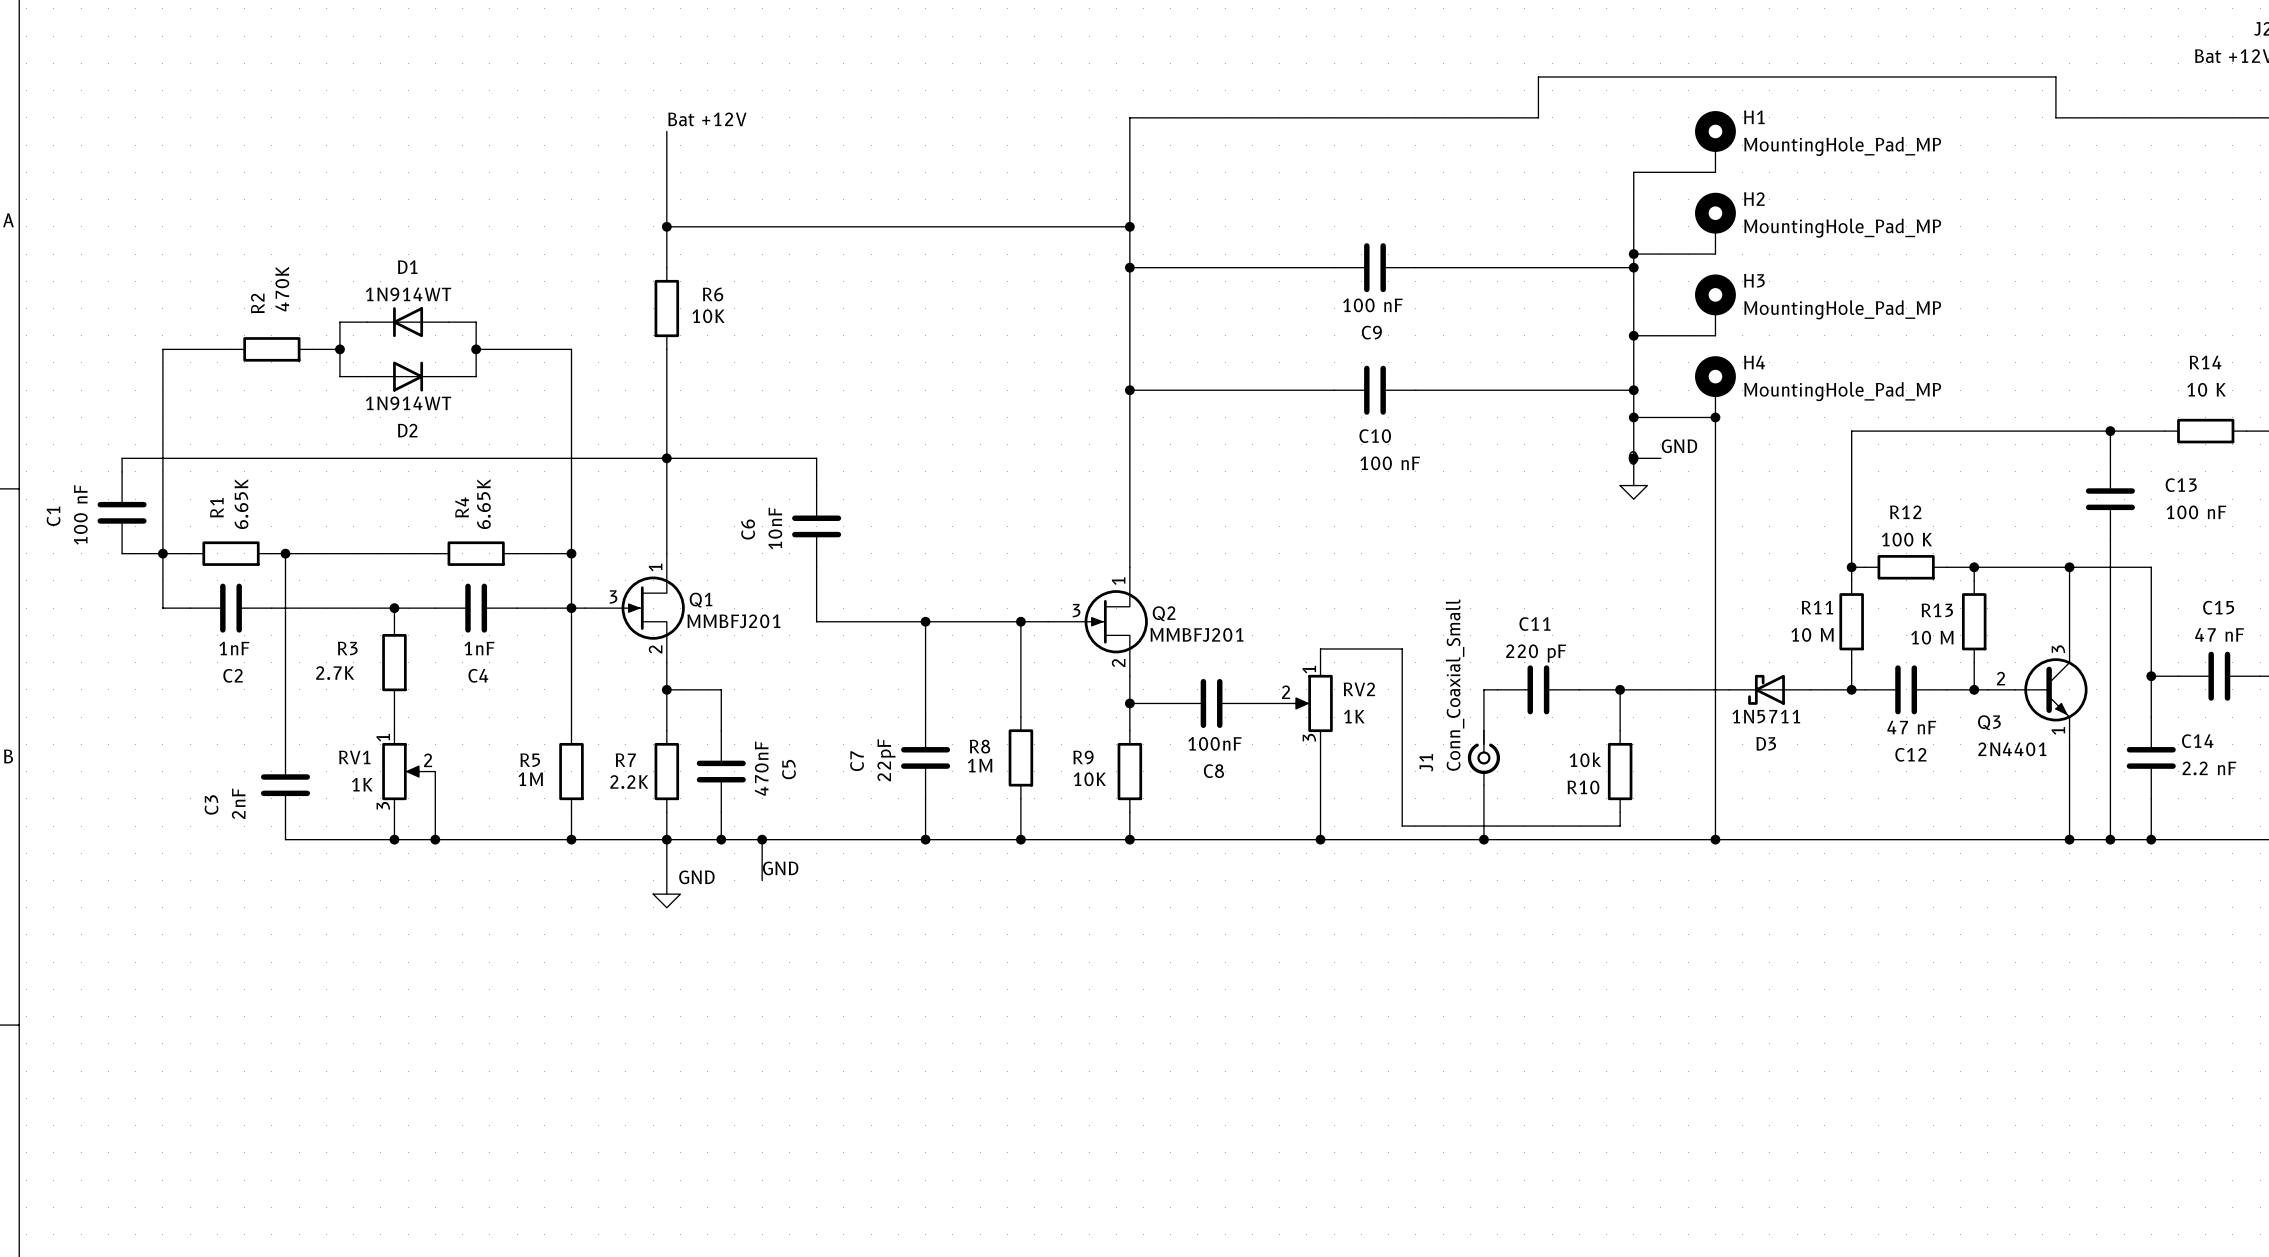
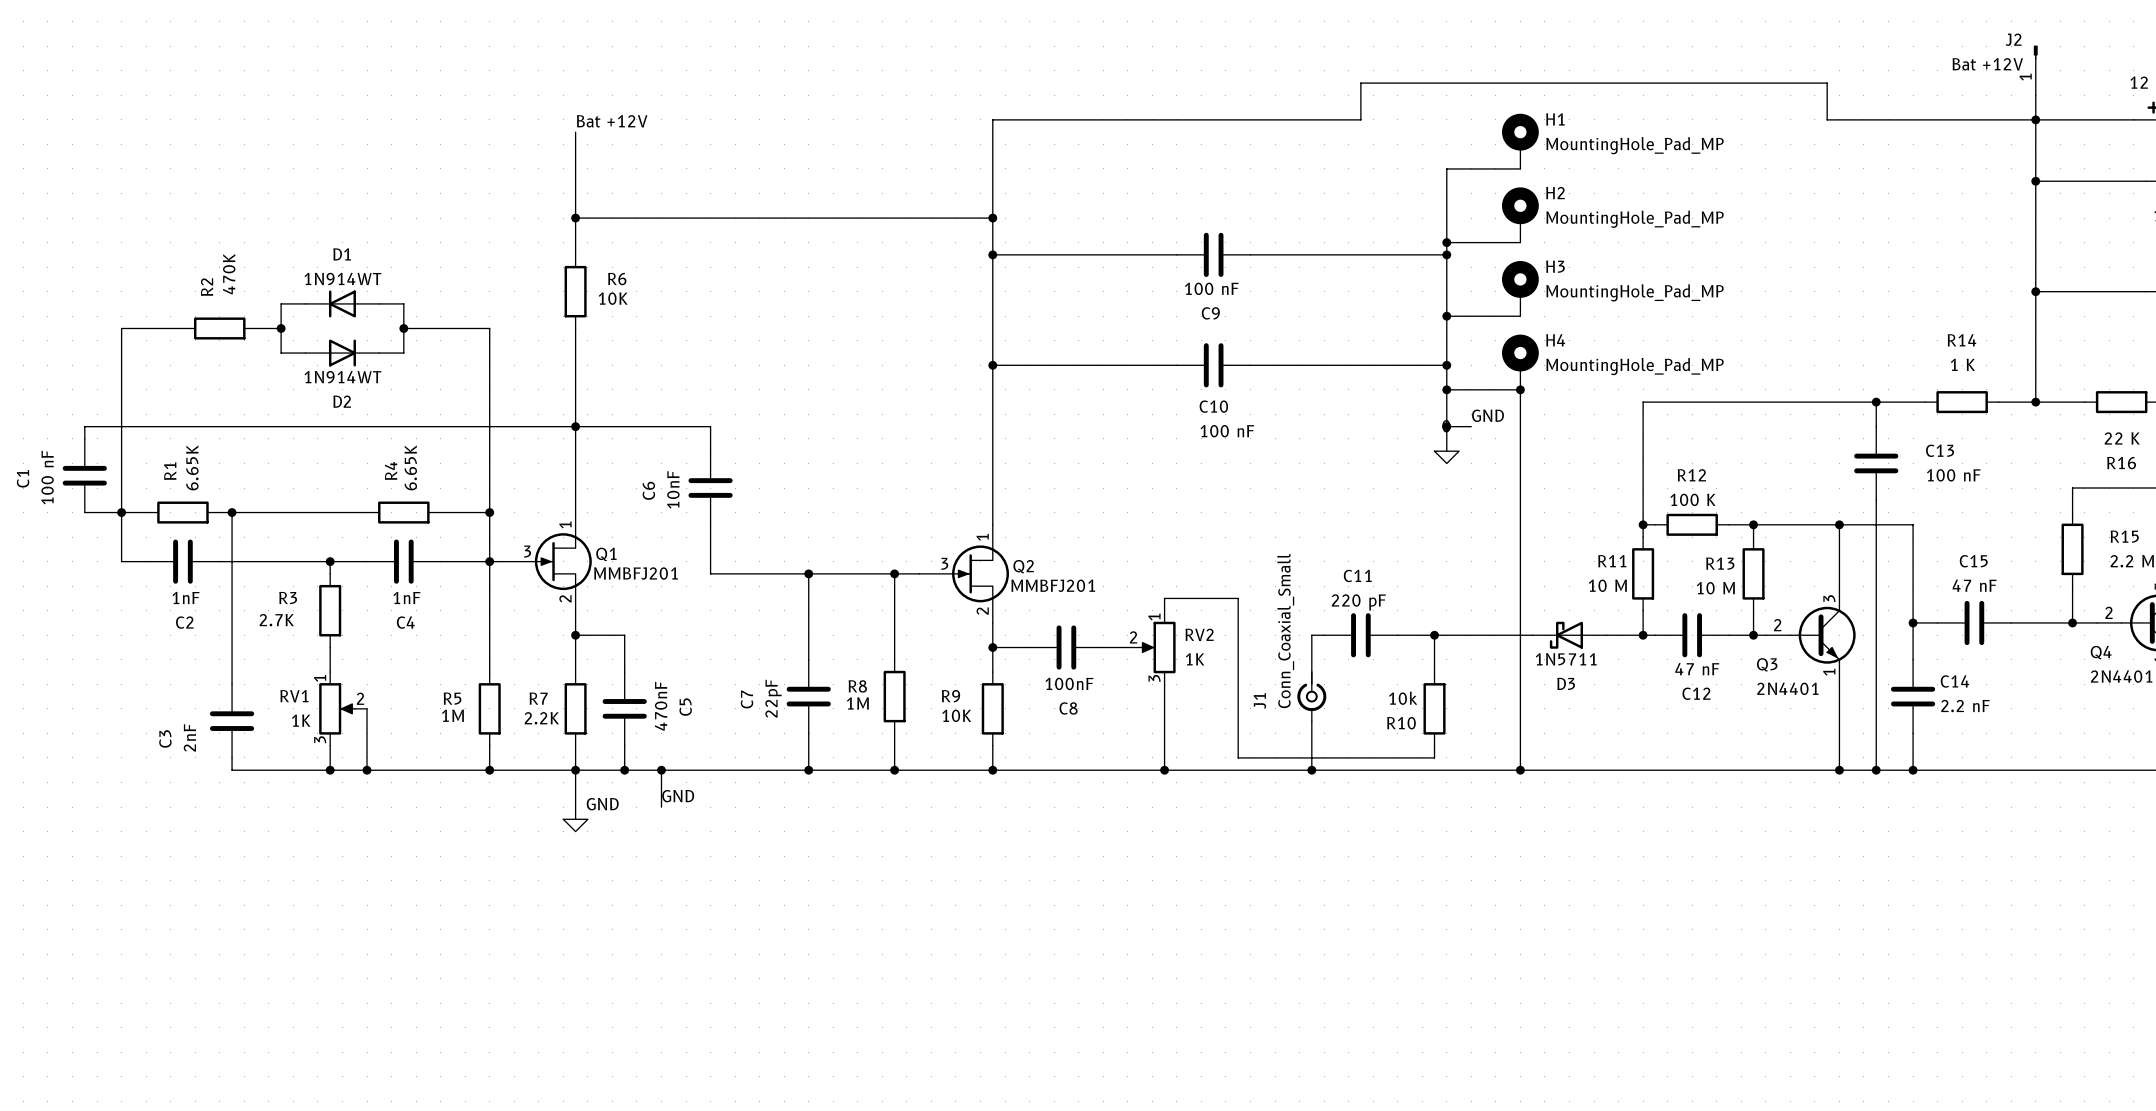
R14 value: 10 K (2206, 389) -> 1 K (1962, 364)

